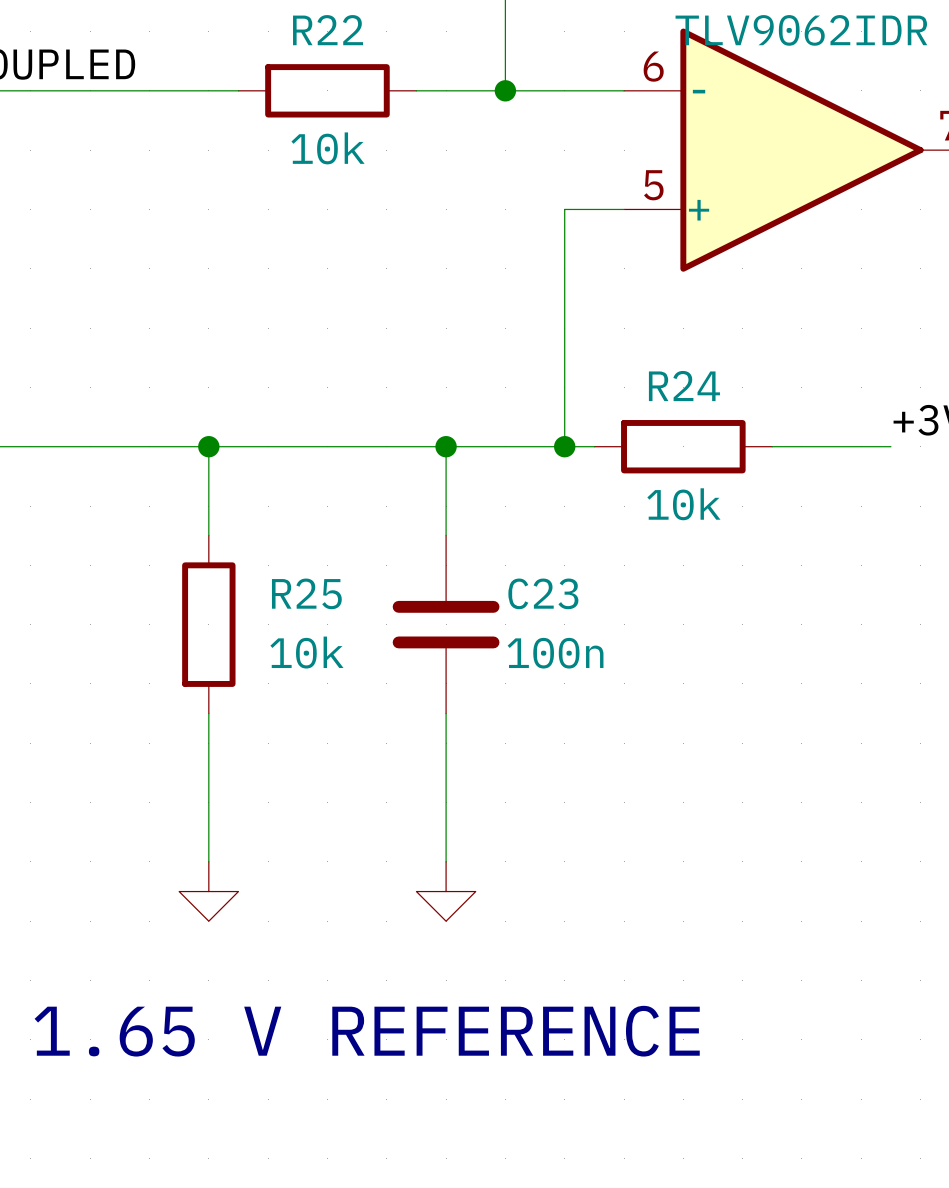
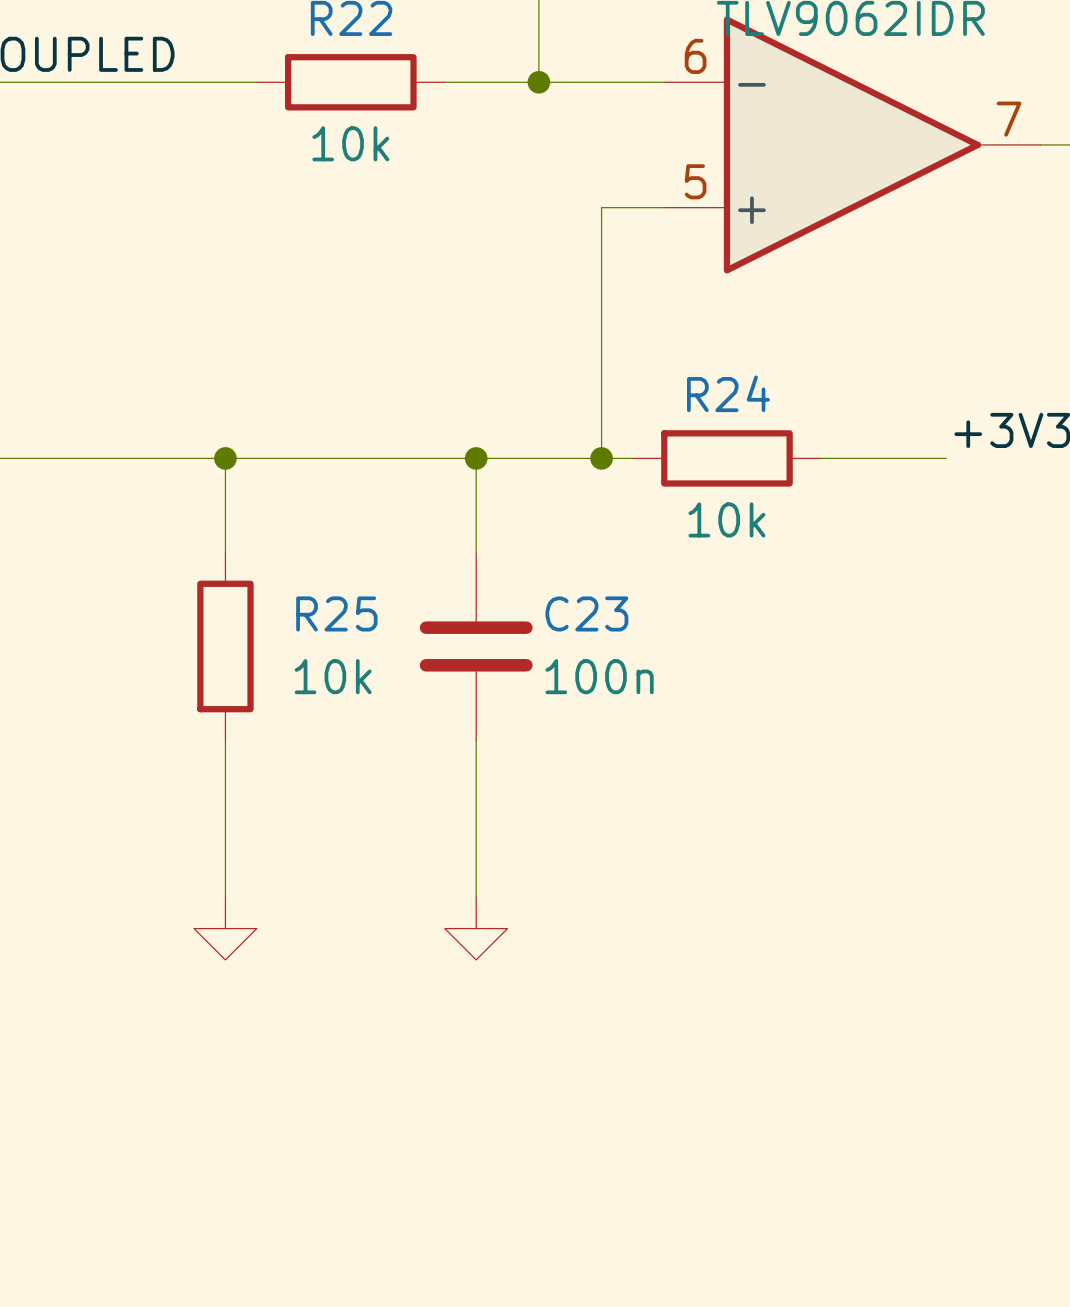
text: 1.65 V REFERENCE (367, 1031) -> none

